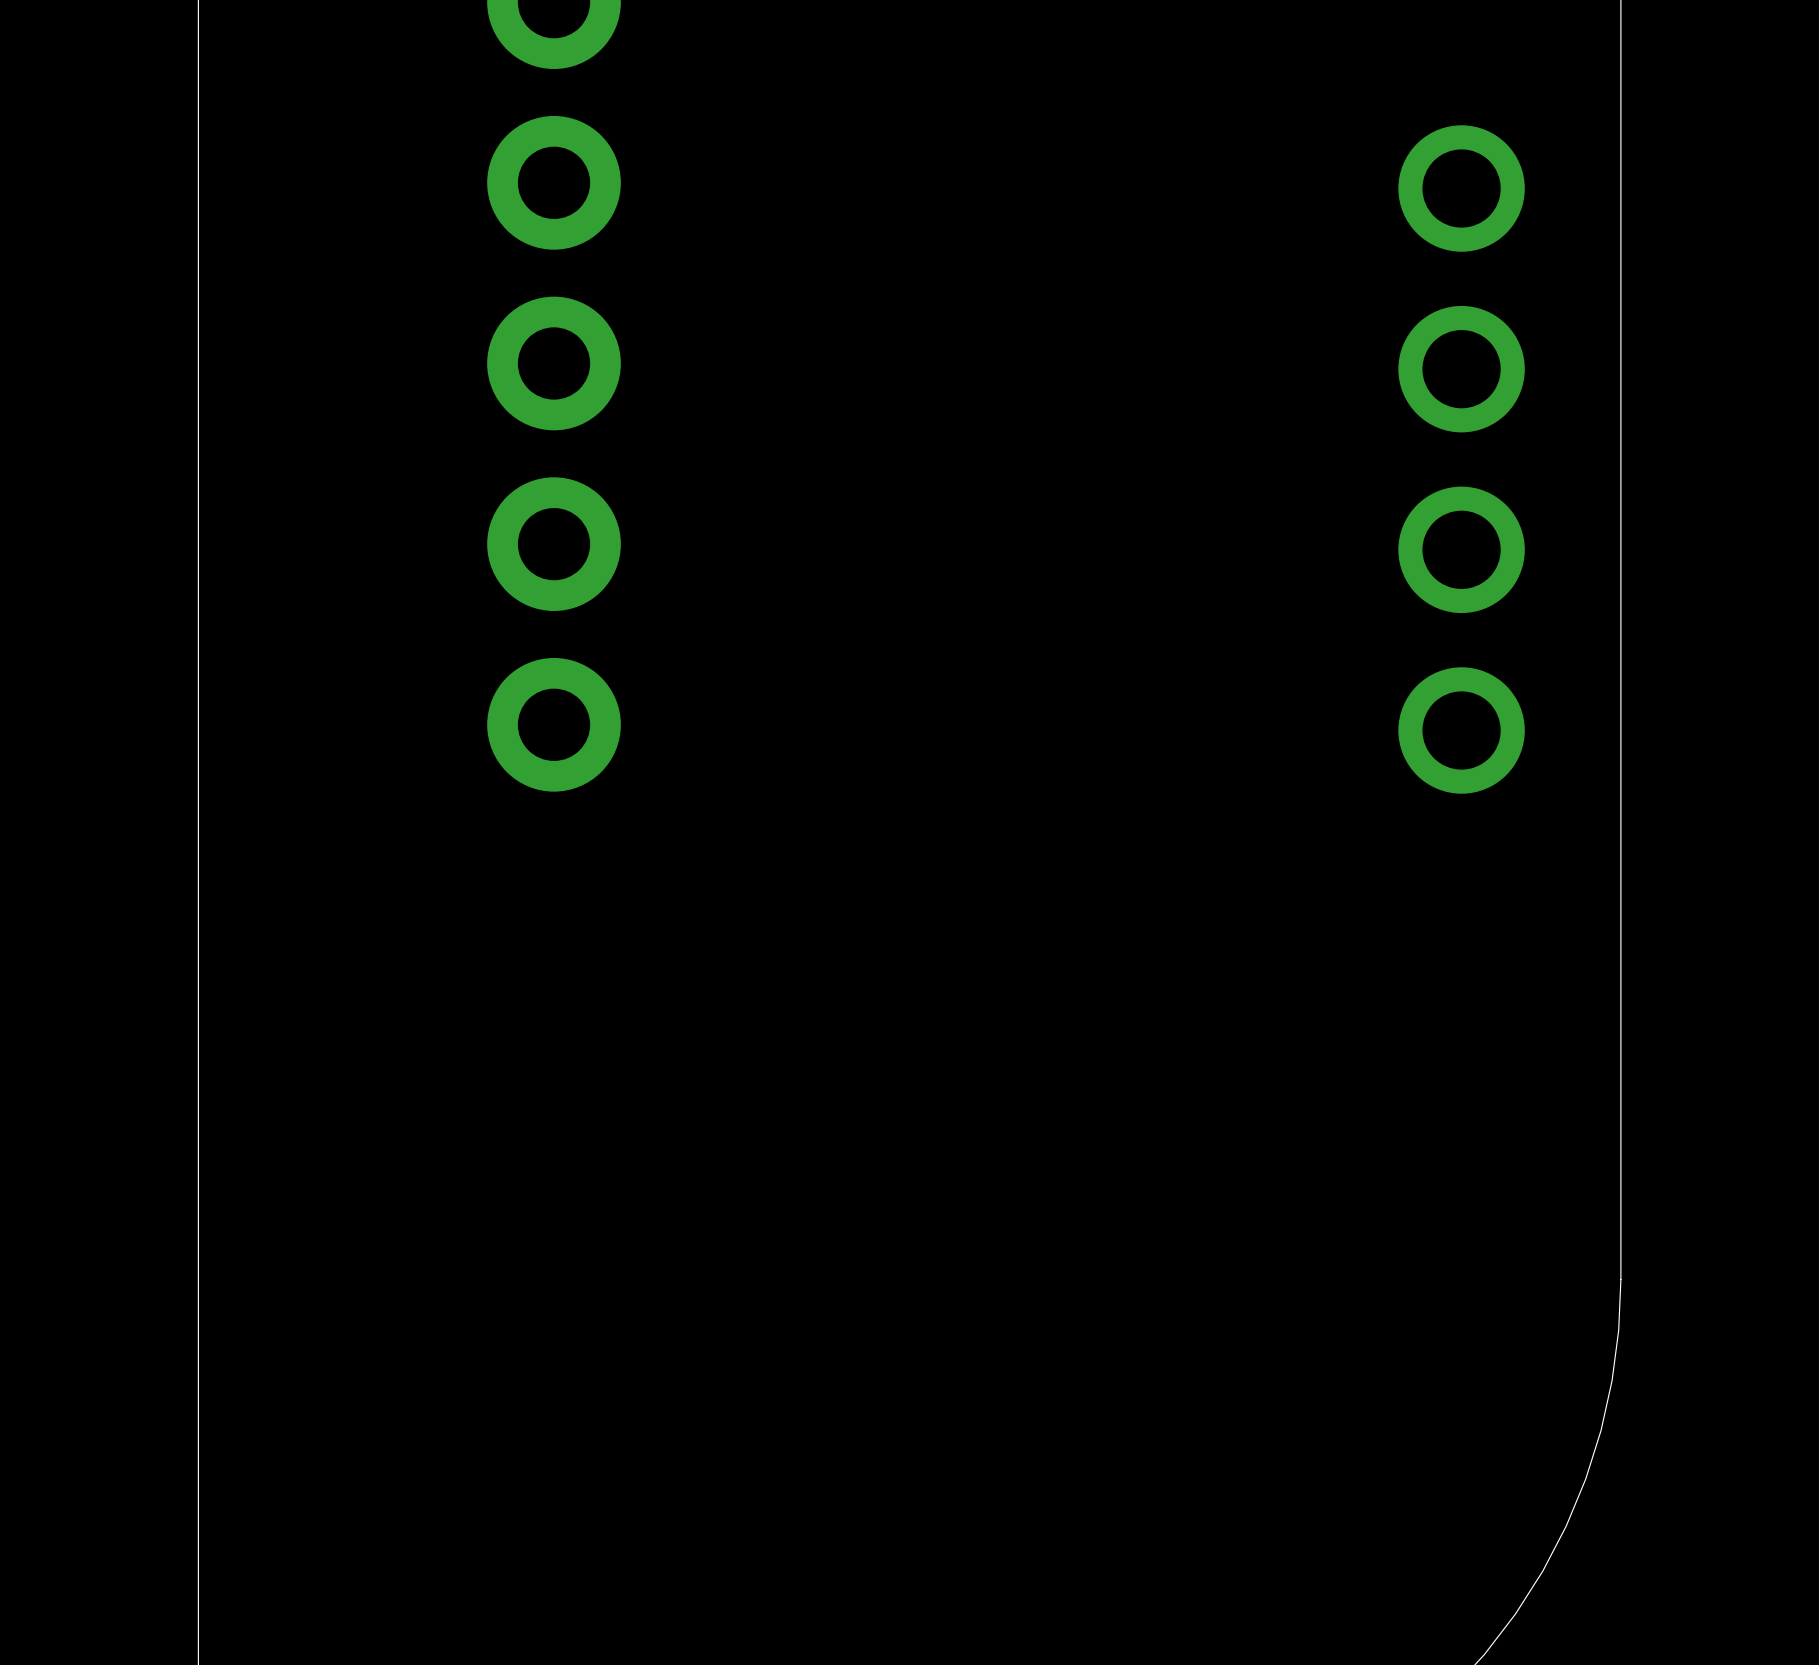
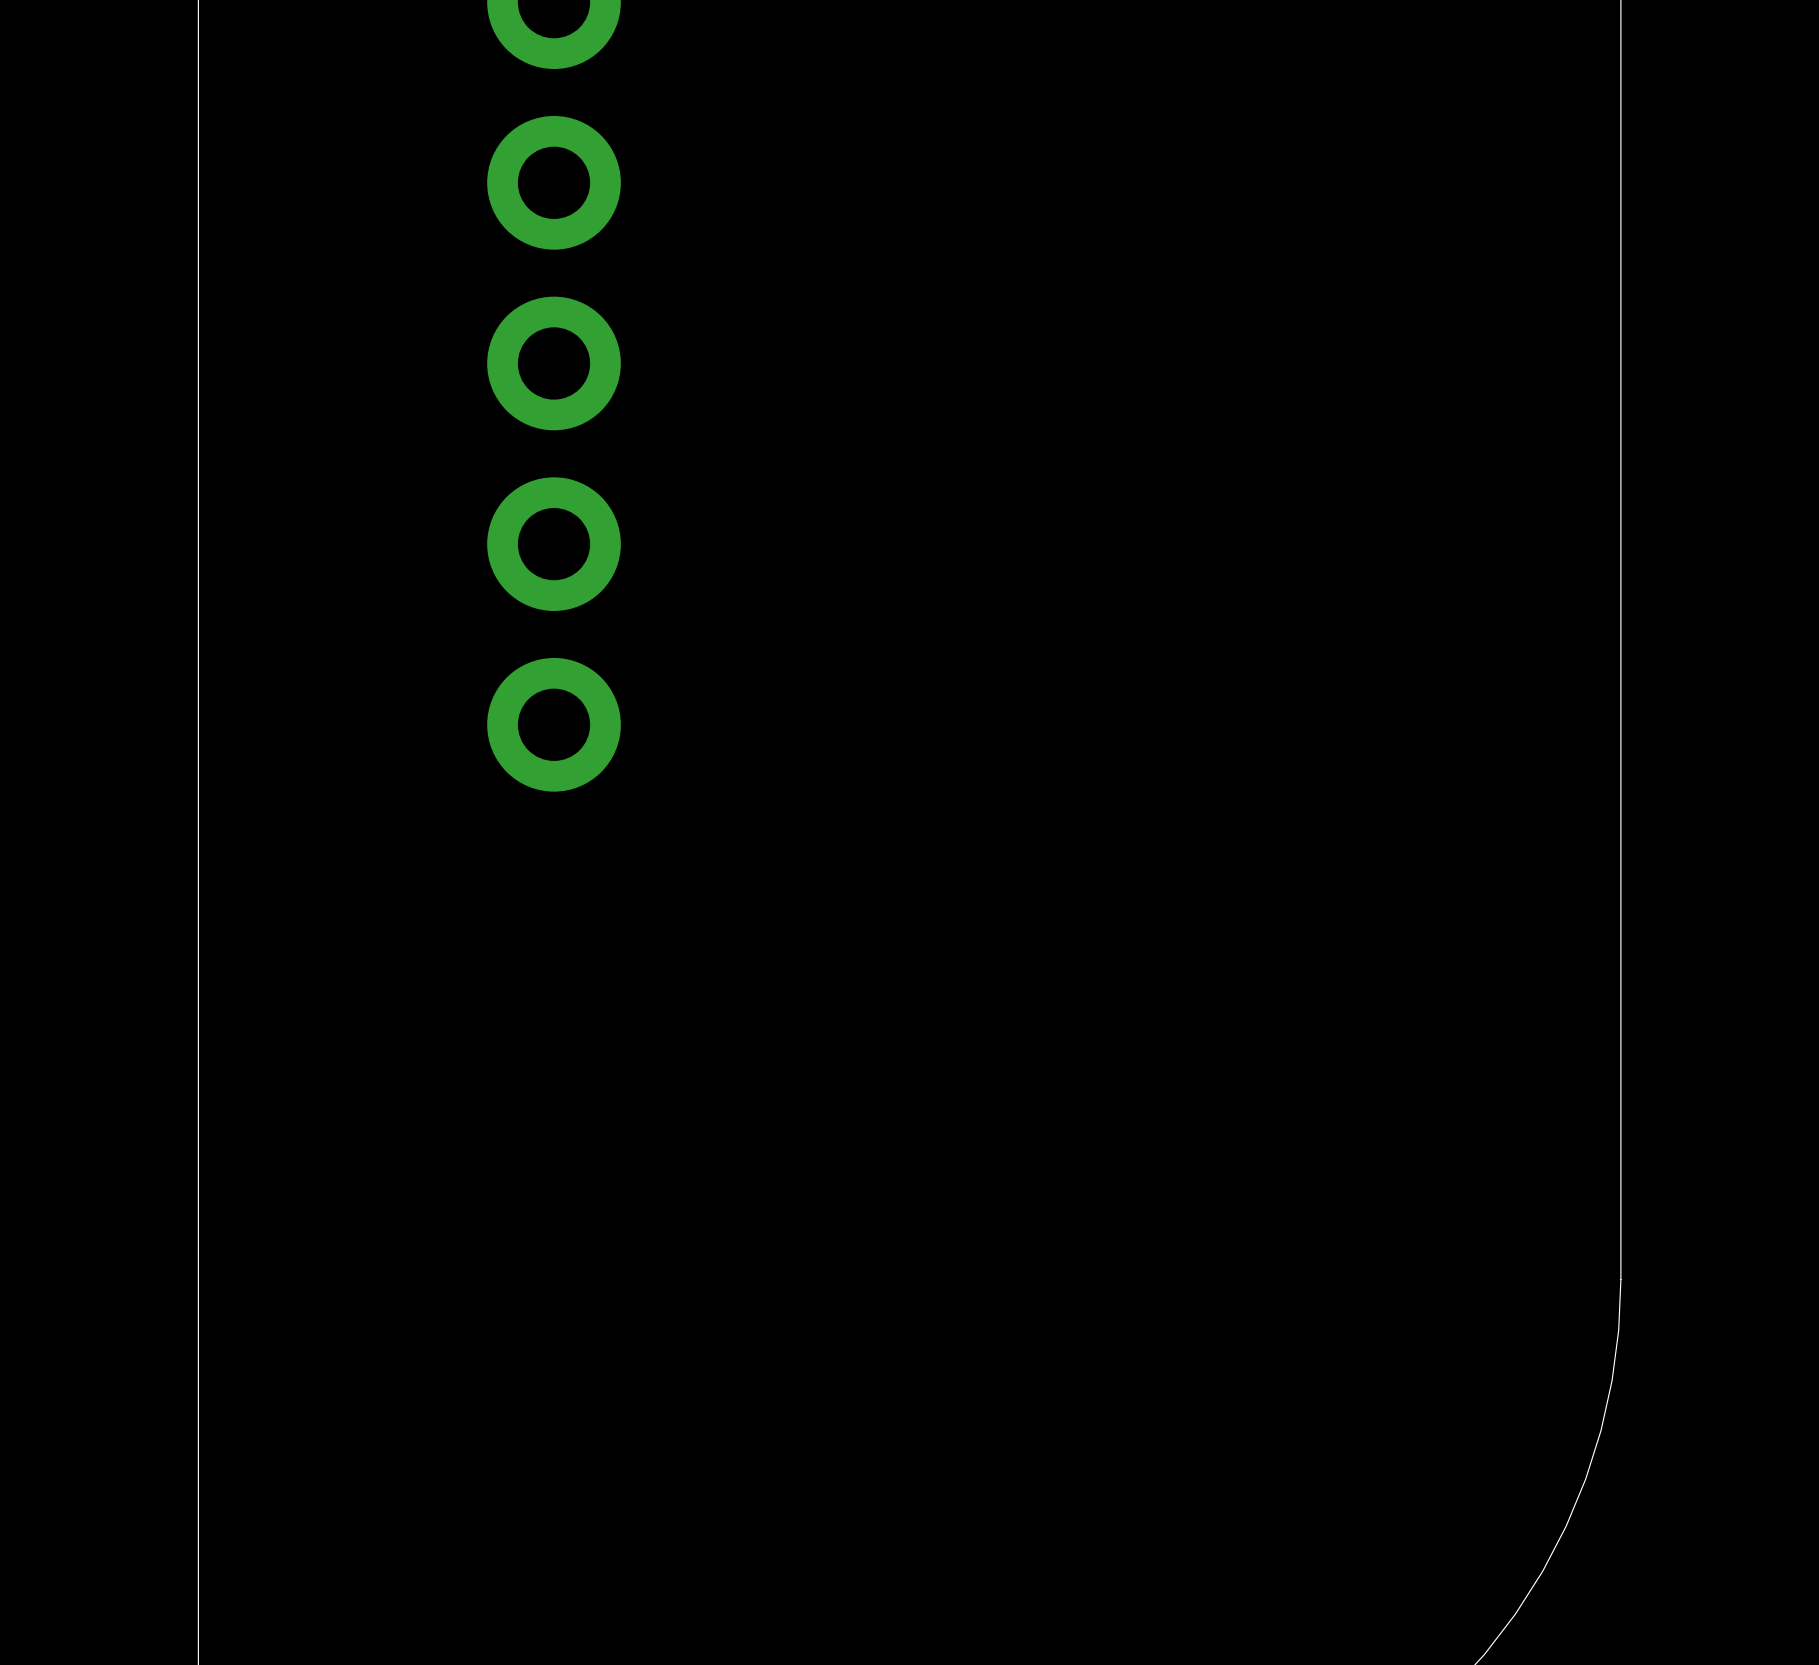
part: (1461, 459) -> none

